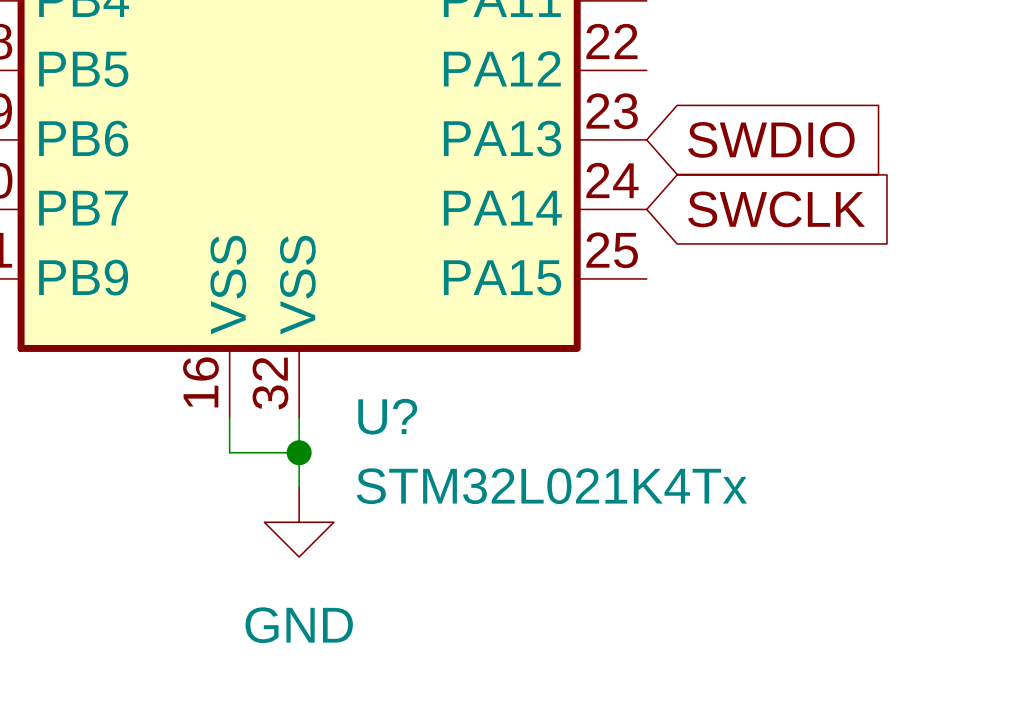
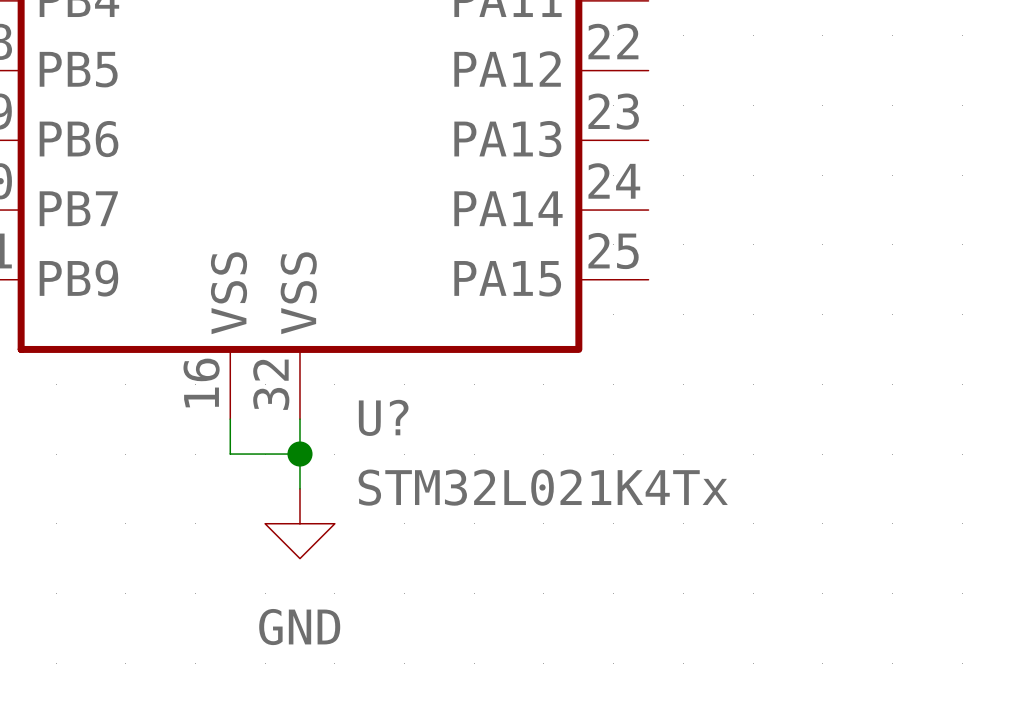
global label: SWDIO (771, 139) -> none
global label: SWCLK (776, 209) -> none

